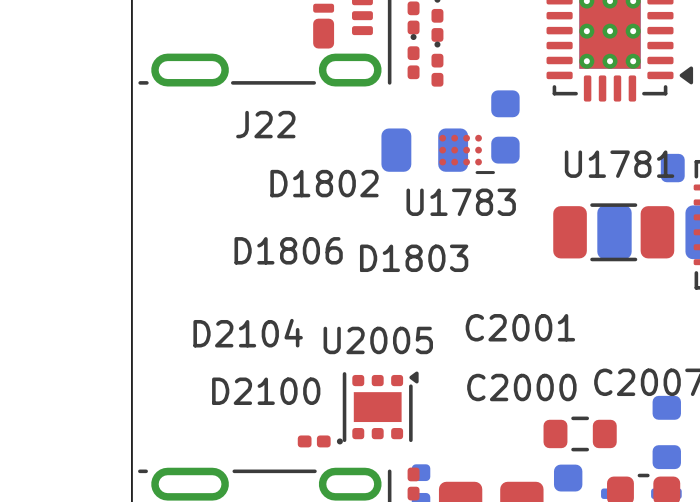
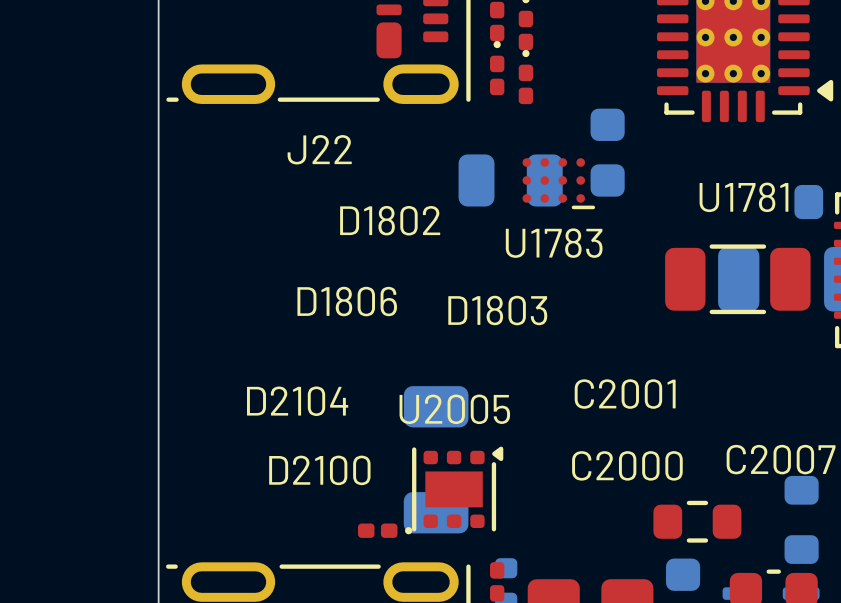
U1783 footprint: [439, 134, 495, 175] -> [522, 158, 596, 210]
part: none -> (436, 459)

